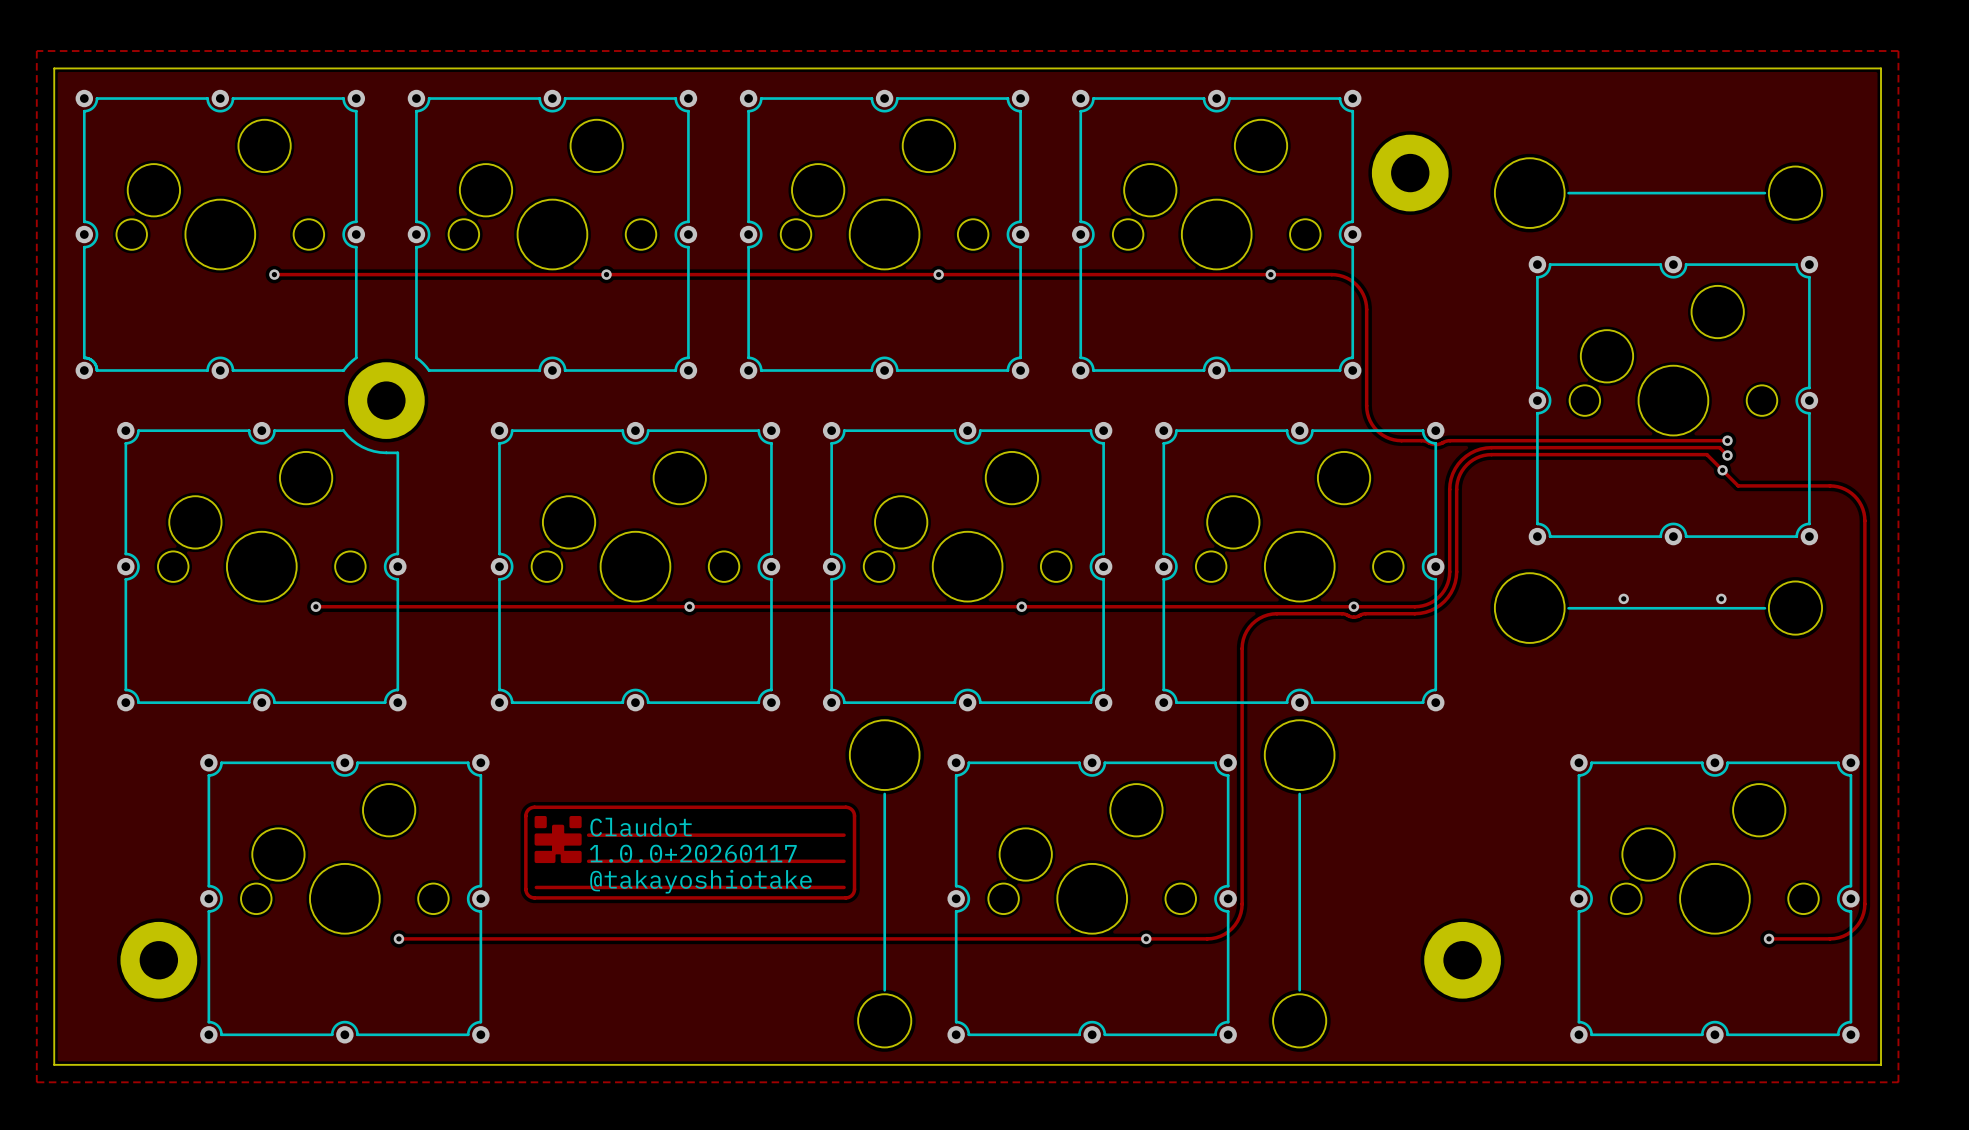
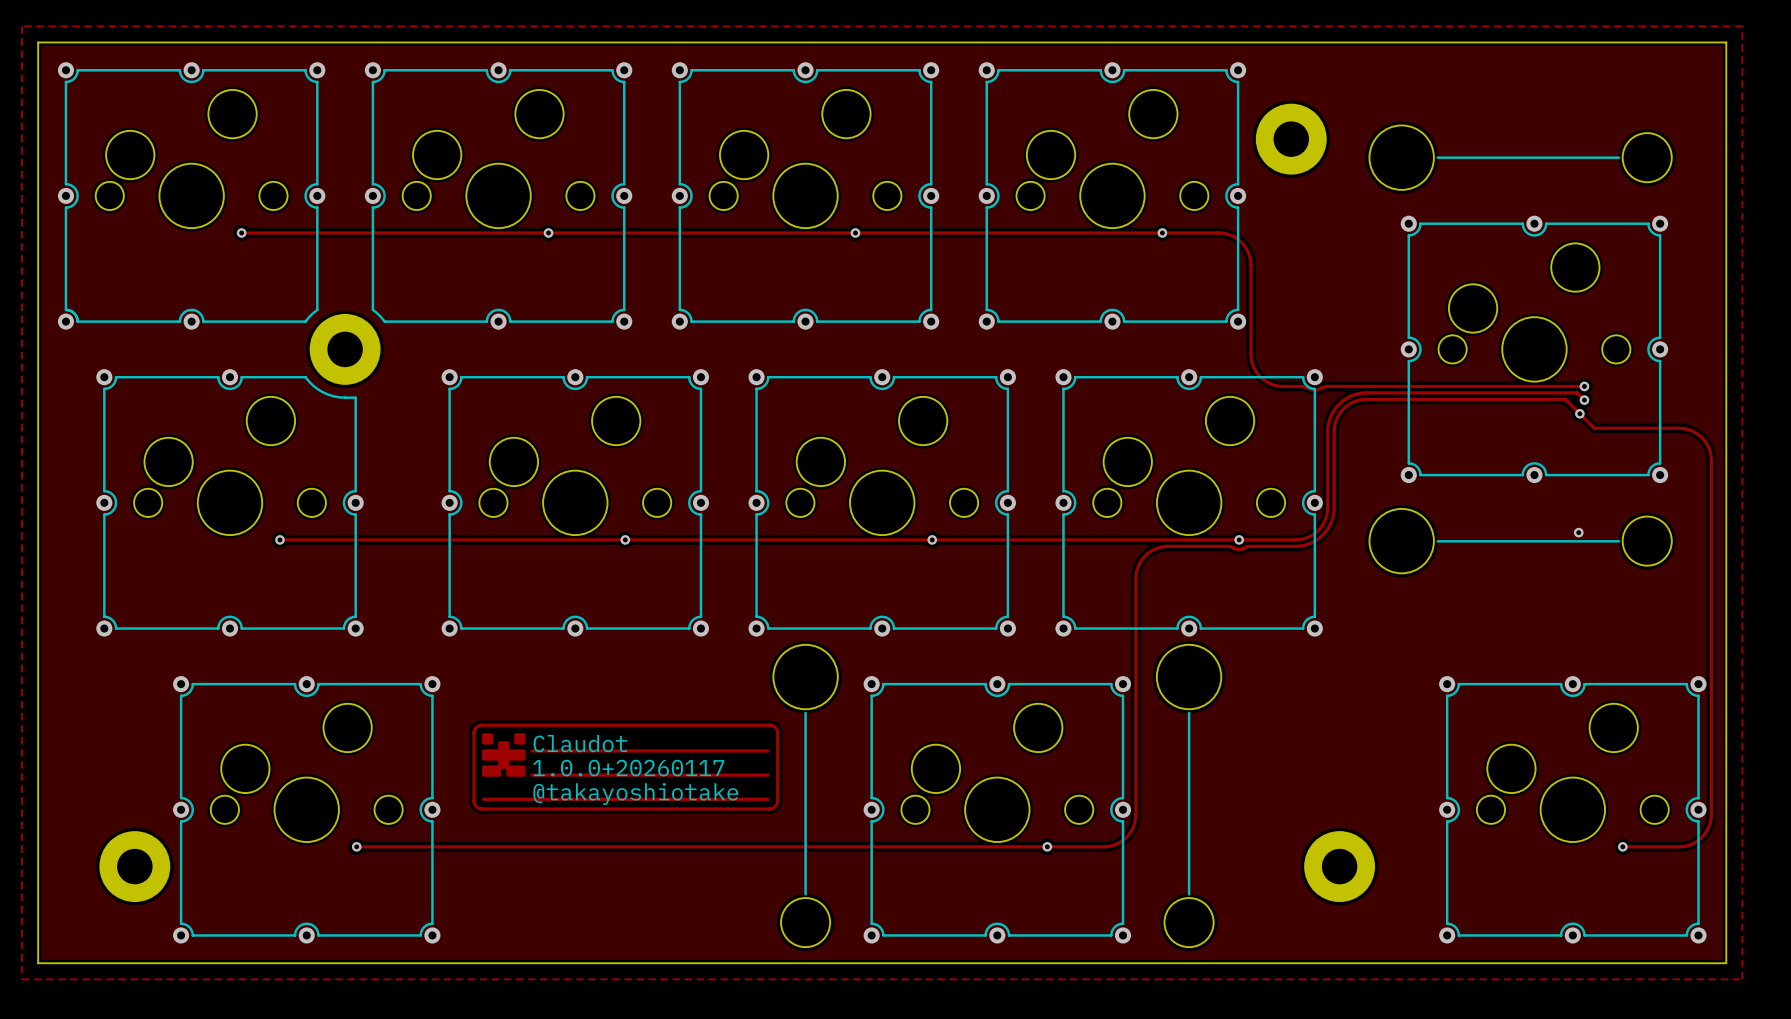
via: (1623, 598) -> none

